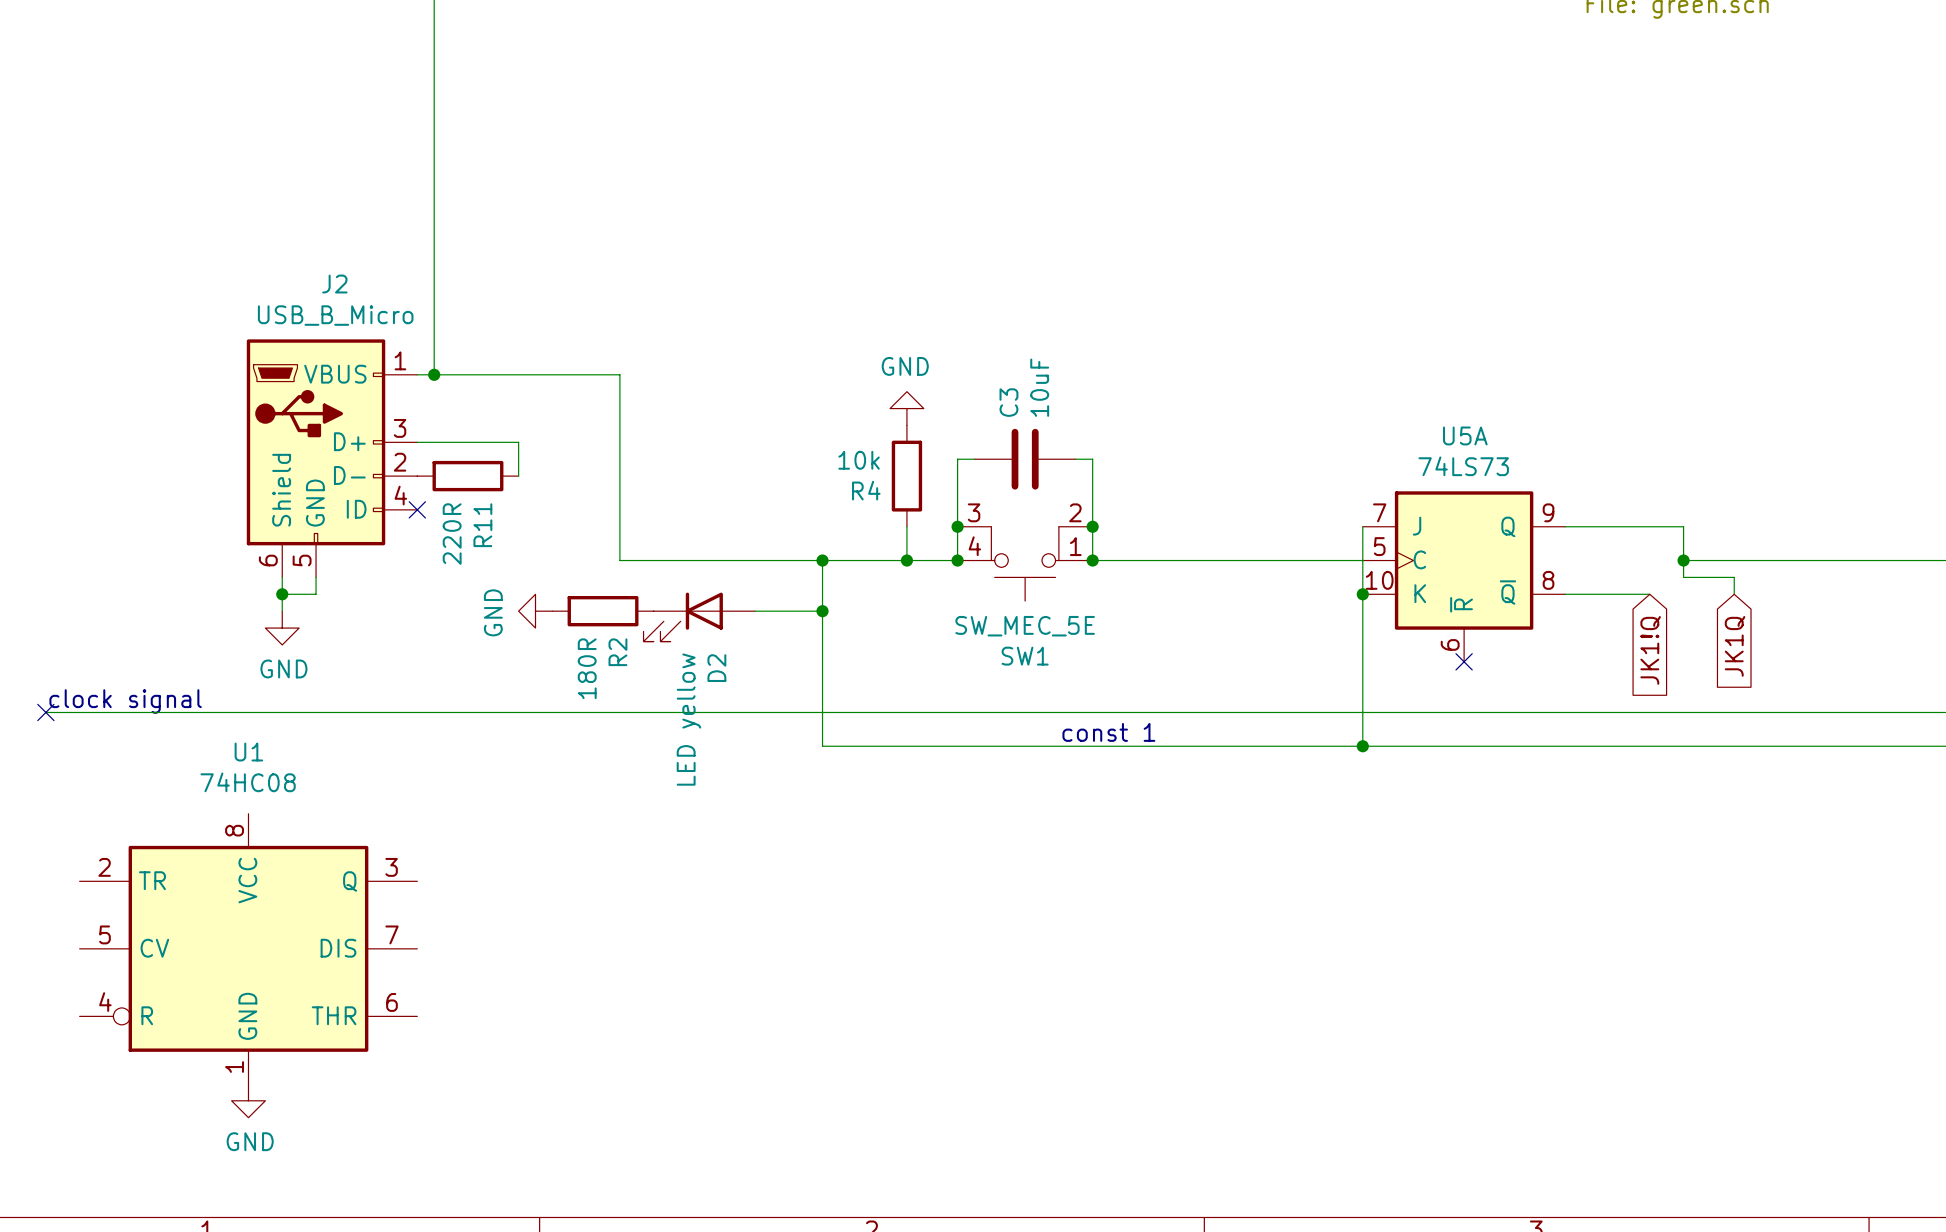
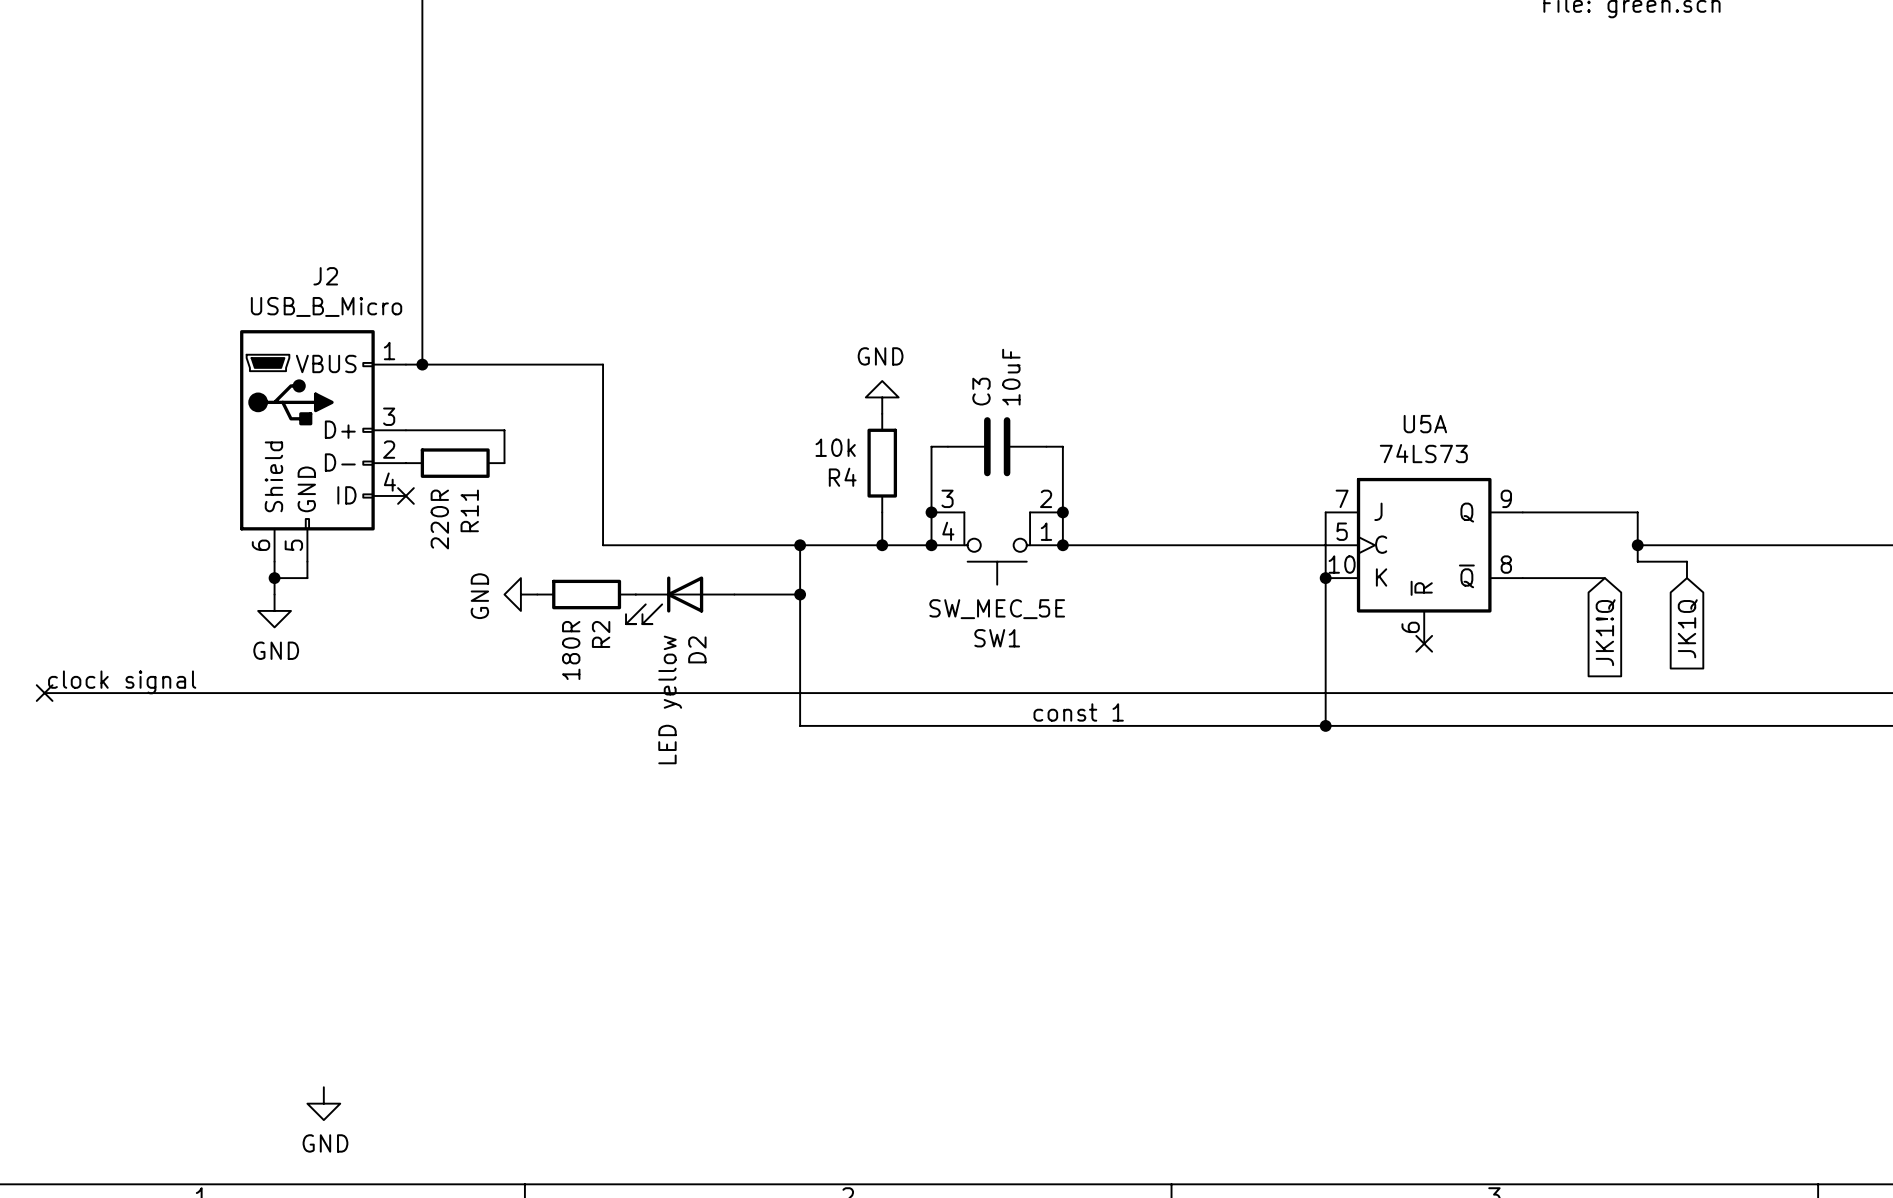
U1: 74HC08 (248, 948) -> none
power symbol position: GND (248, 1100) -> GND (323, 1103)

